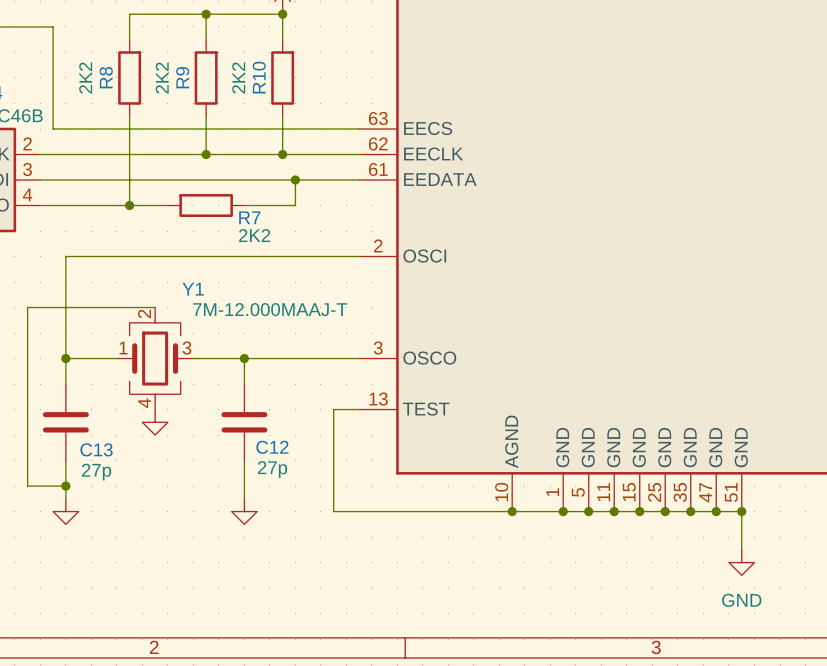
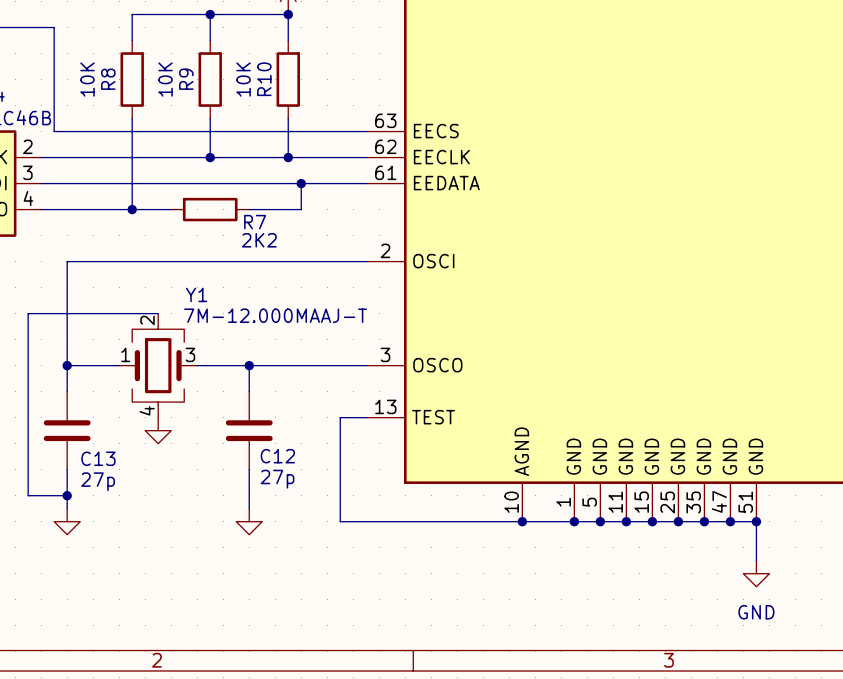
R8 value: 2K2 (85, 77) -> 10K (87, 79)
R9 value: 2K2 (162, 77) -> 10K (165, 79)
R10 value: 2K2 (238, 77) -> 10K (243, 79)

